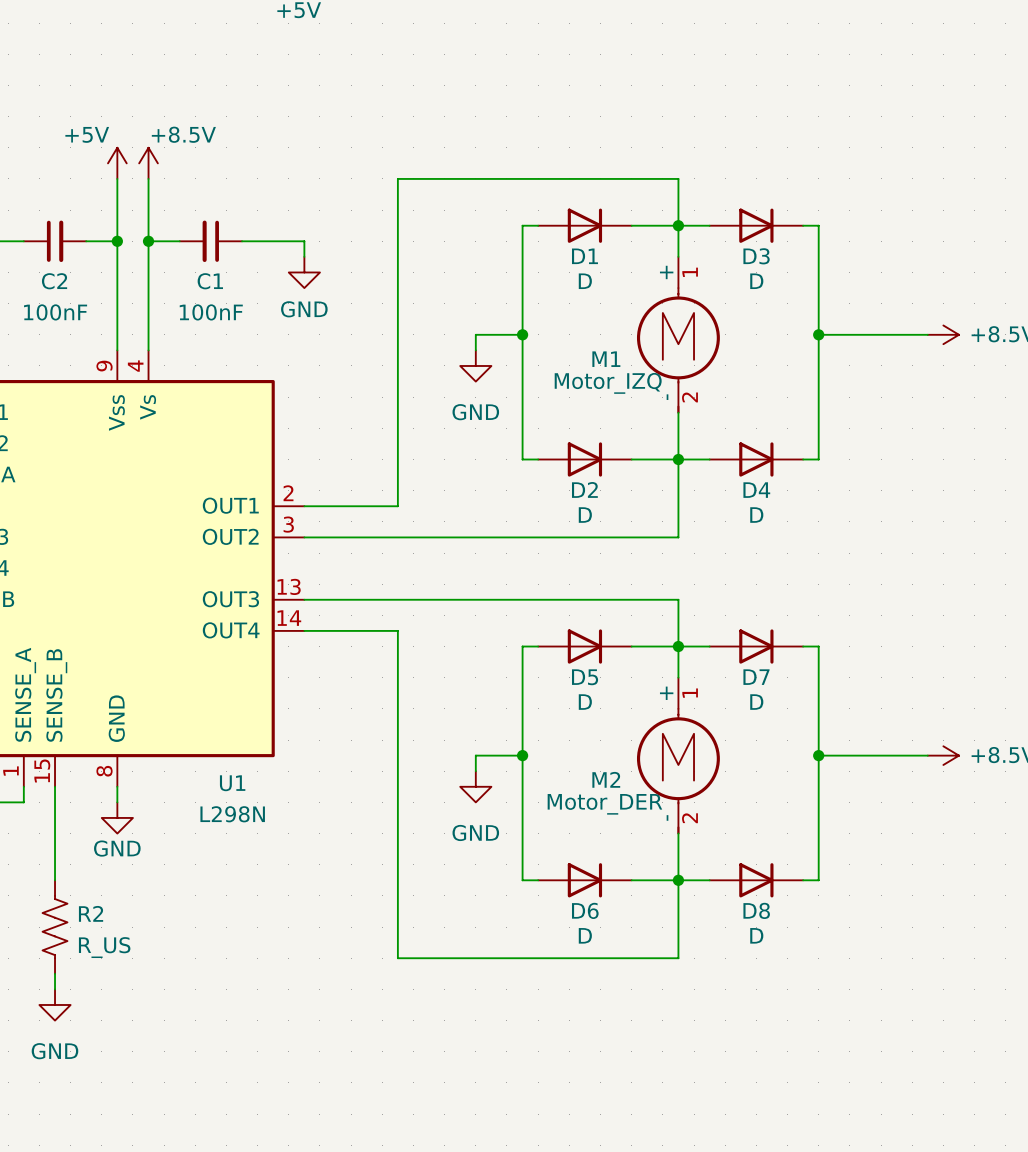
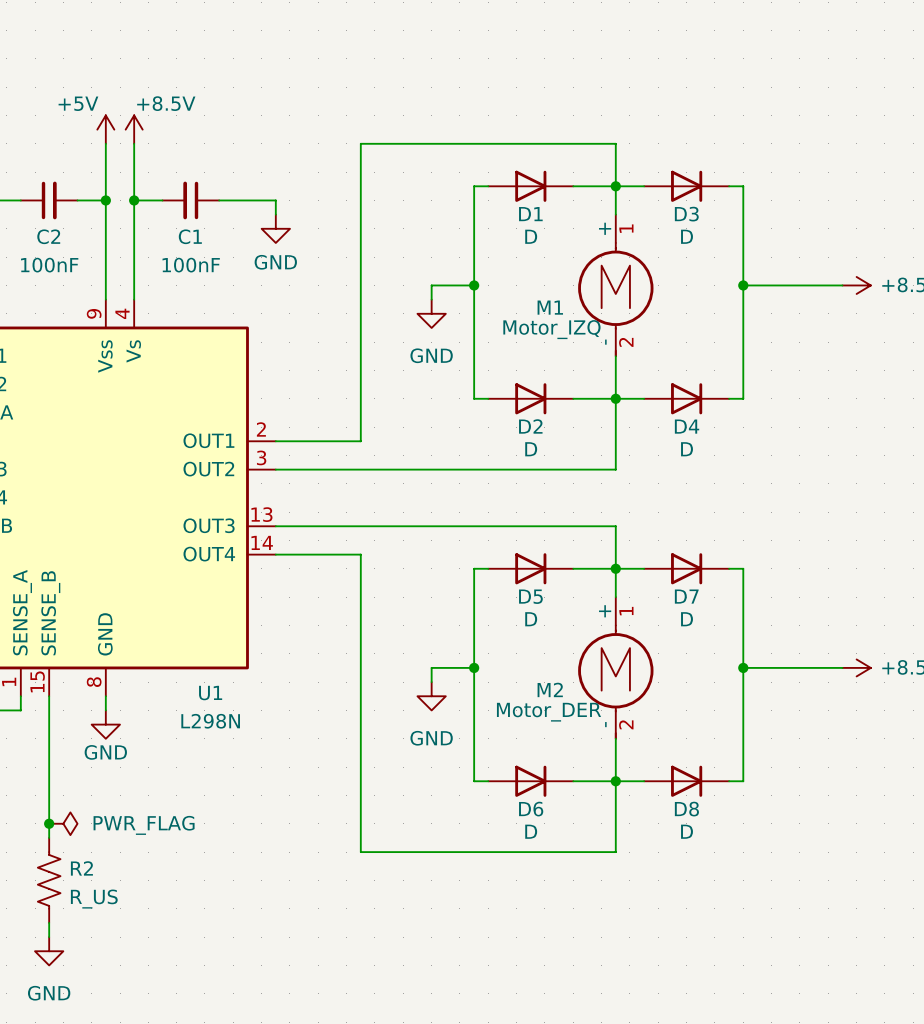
wire: none -> (49, 781) (49, 837)
R2 position: (55, 927) -> (49, 880)
junction: none -> (49, 823)
power symbol: none -> PWR_FLAG (63, 823)
wire: (55, 973) (55, 989) -> (49, 922) (49, 937)
power symbol position: GND (55, 1004) -> GND (49, 951)

